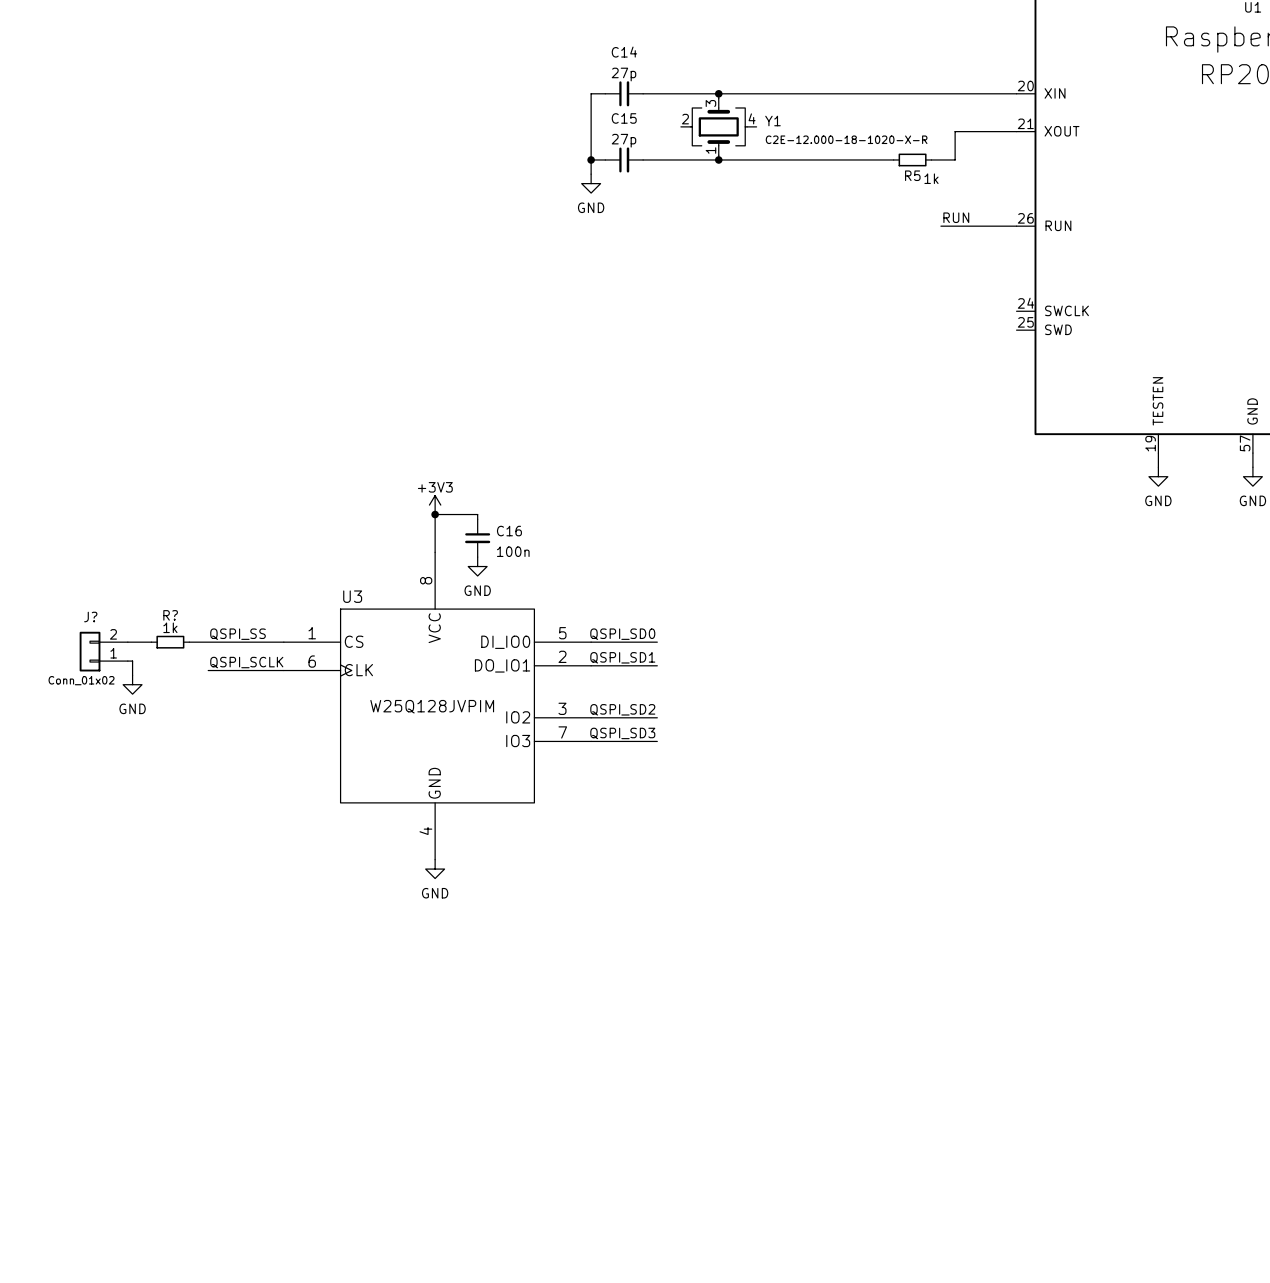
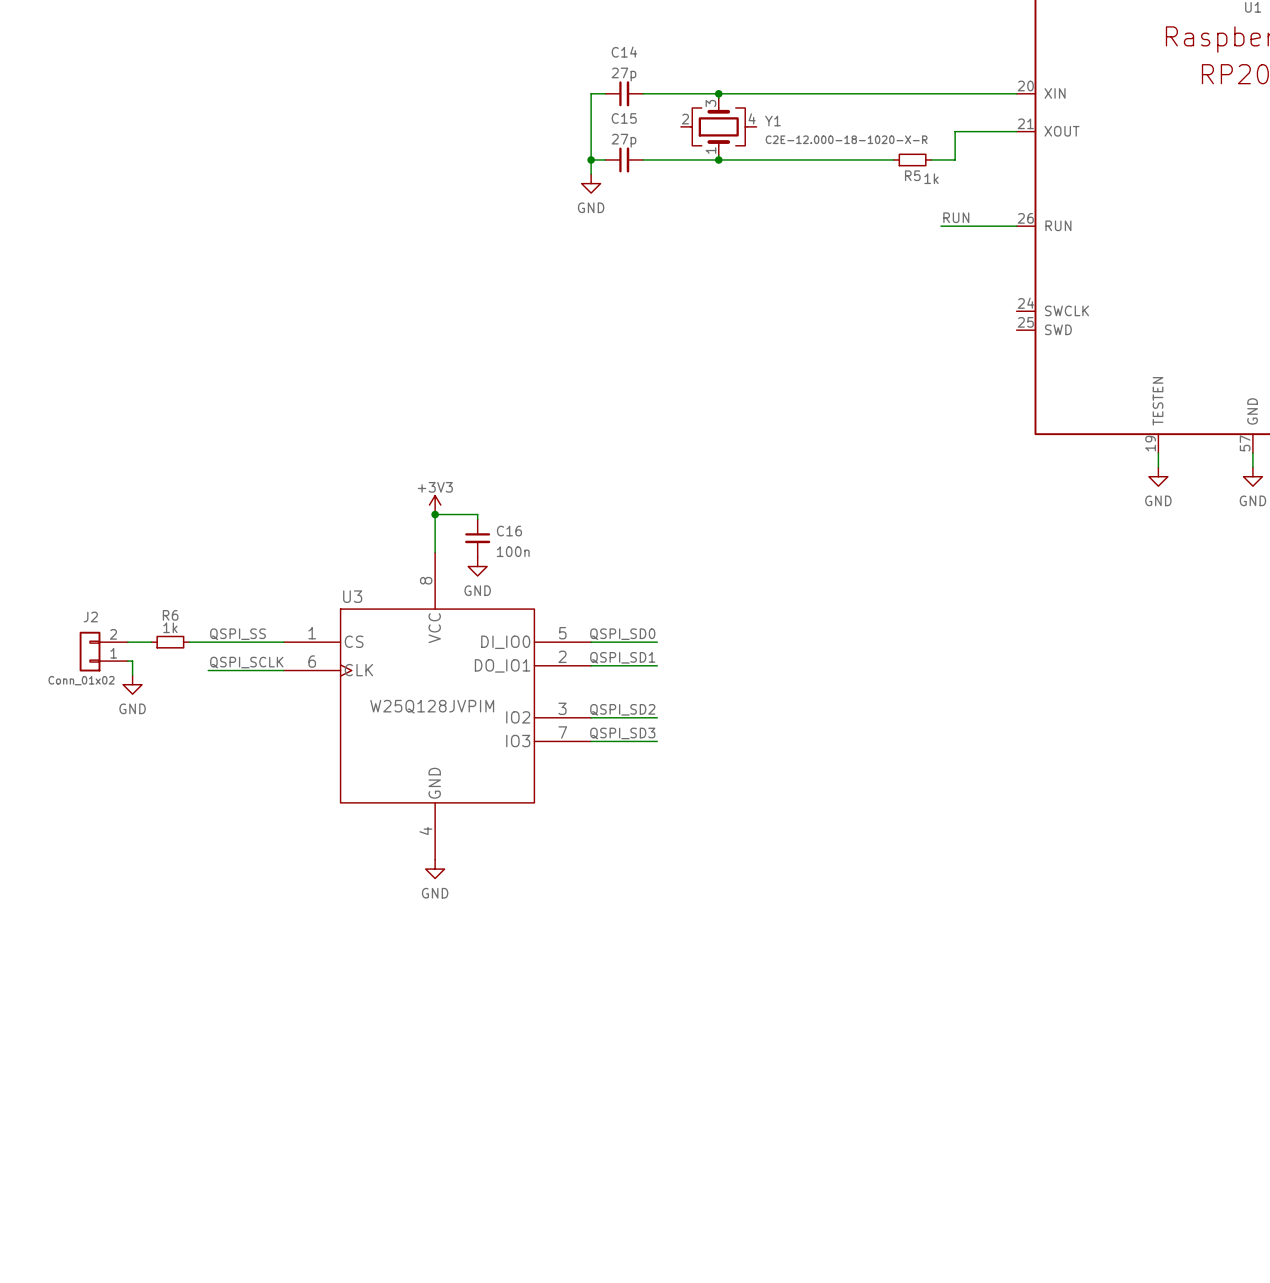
R? name: R? (170, 615) -> R6 (170, 615)
J? name: J? (90, 617) -> J2 (90, 617)

